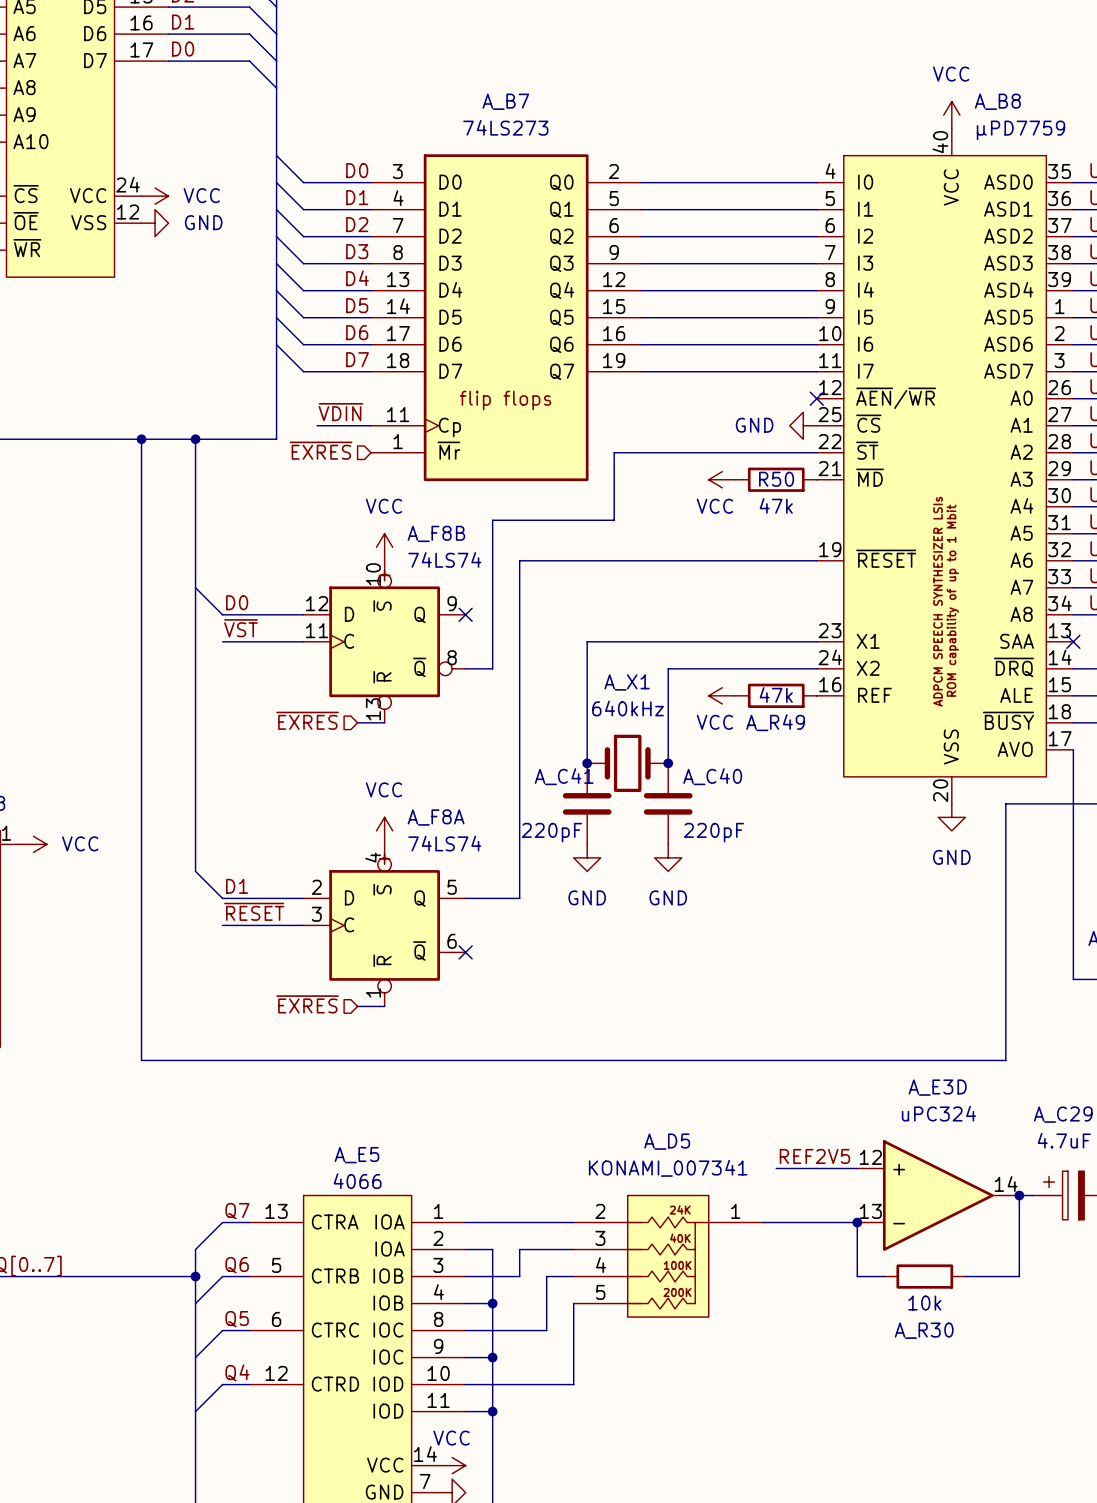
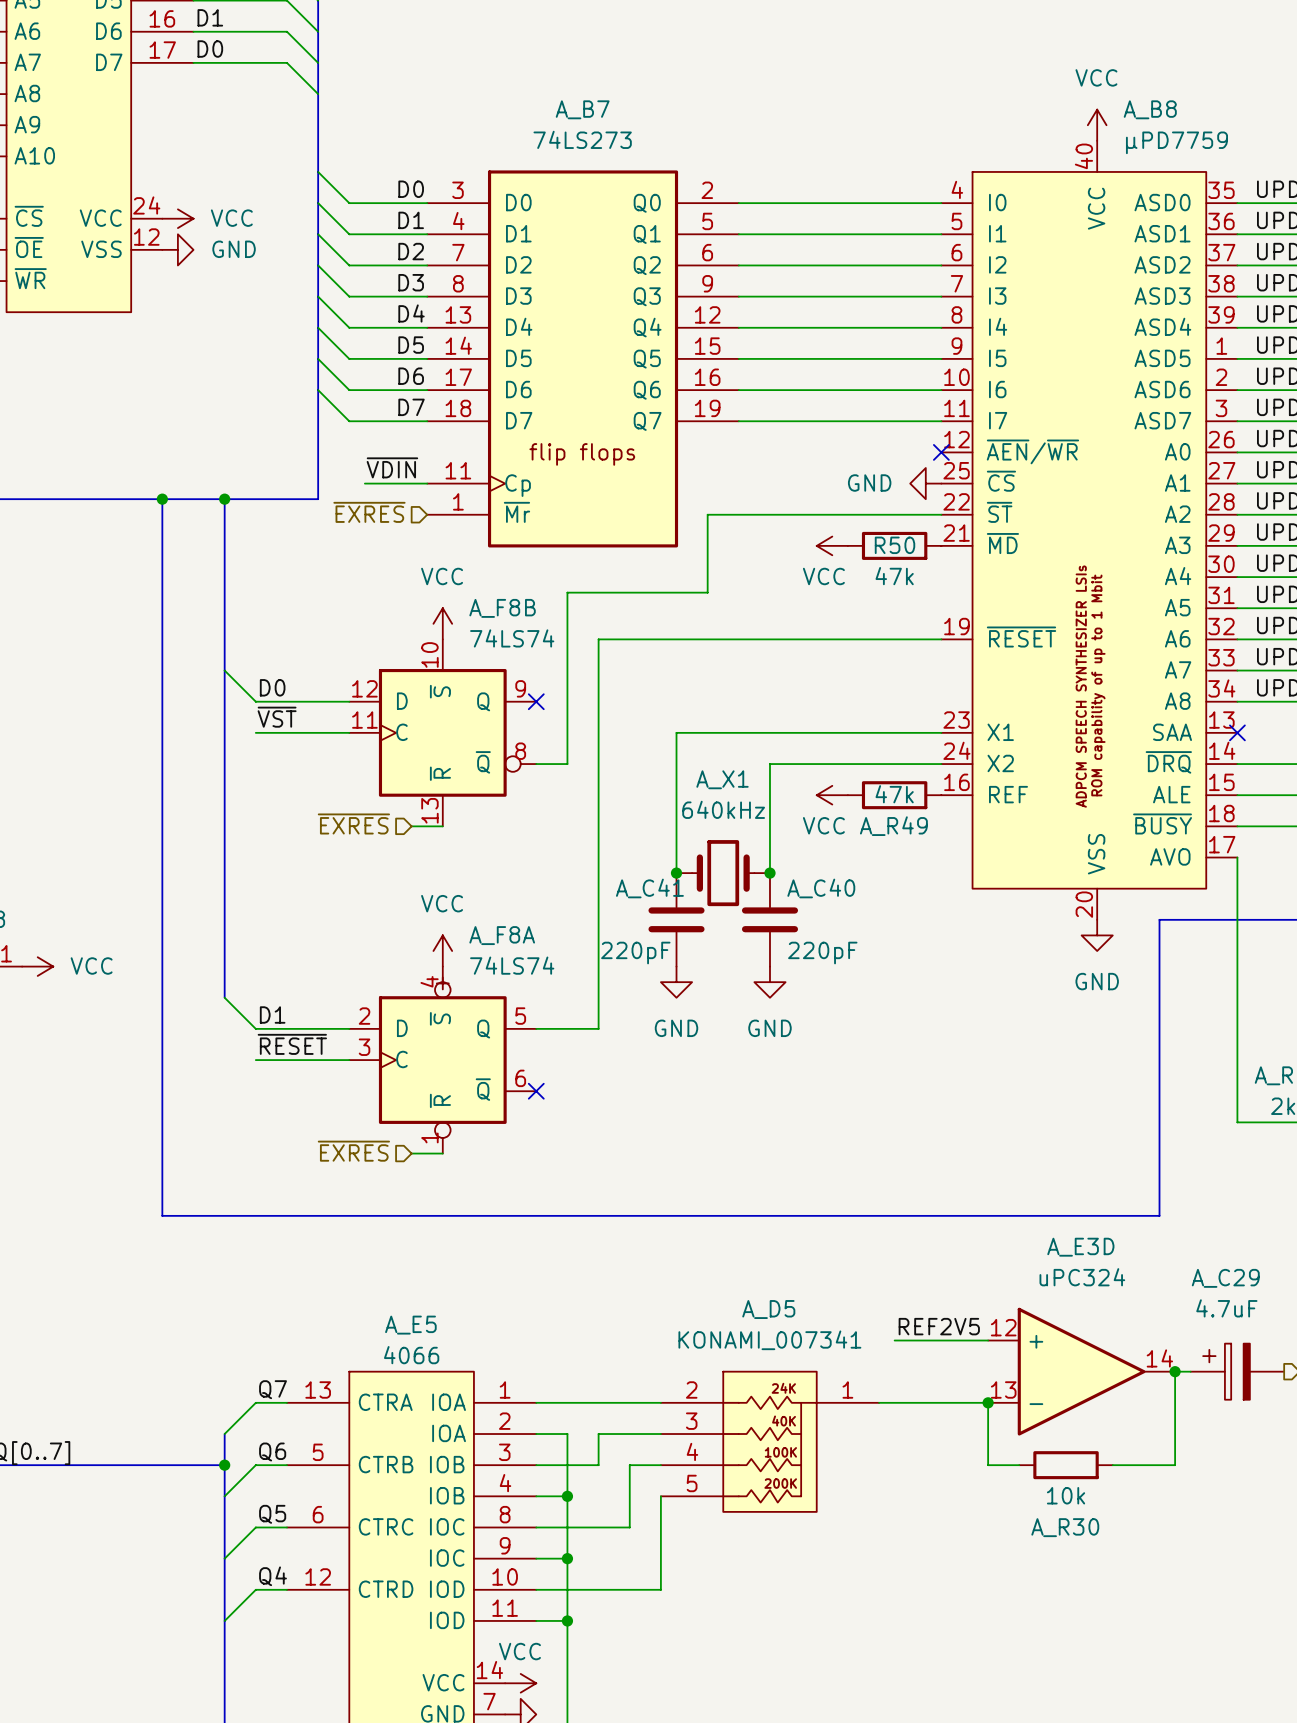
A_F8B symbol: [303, 560, 466, 723] -> [349, 639, 537, 827]

